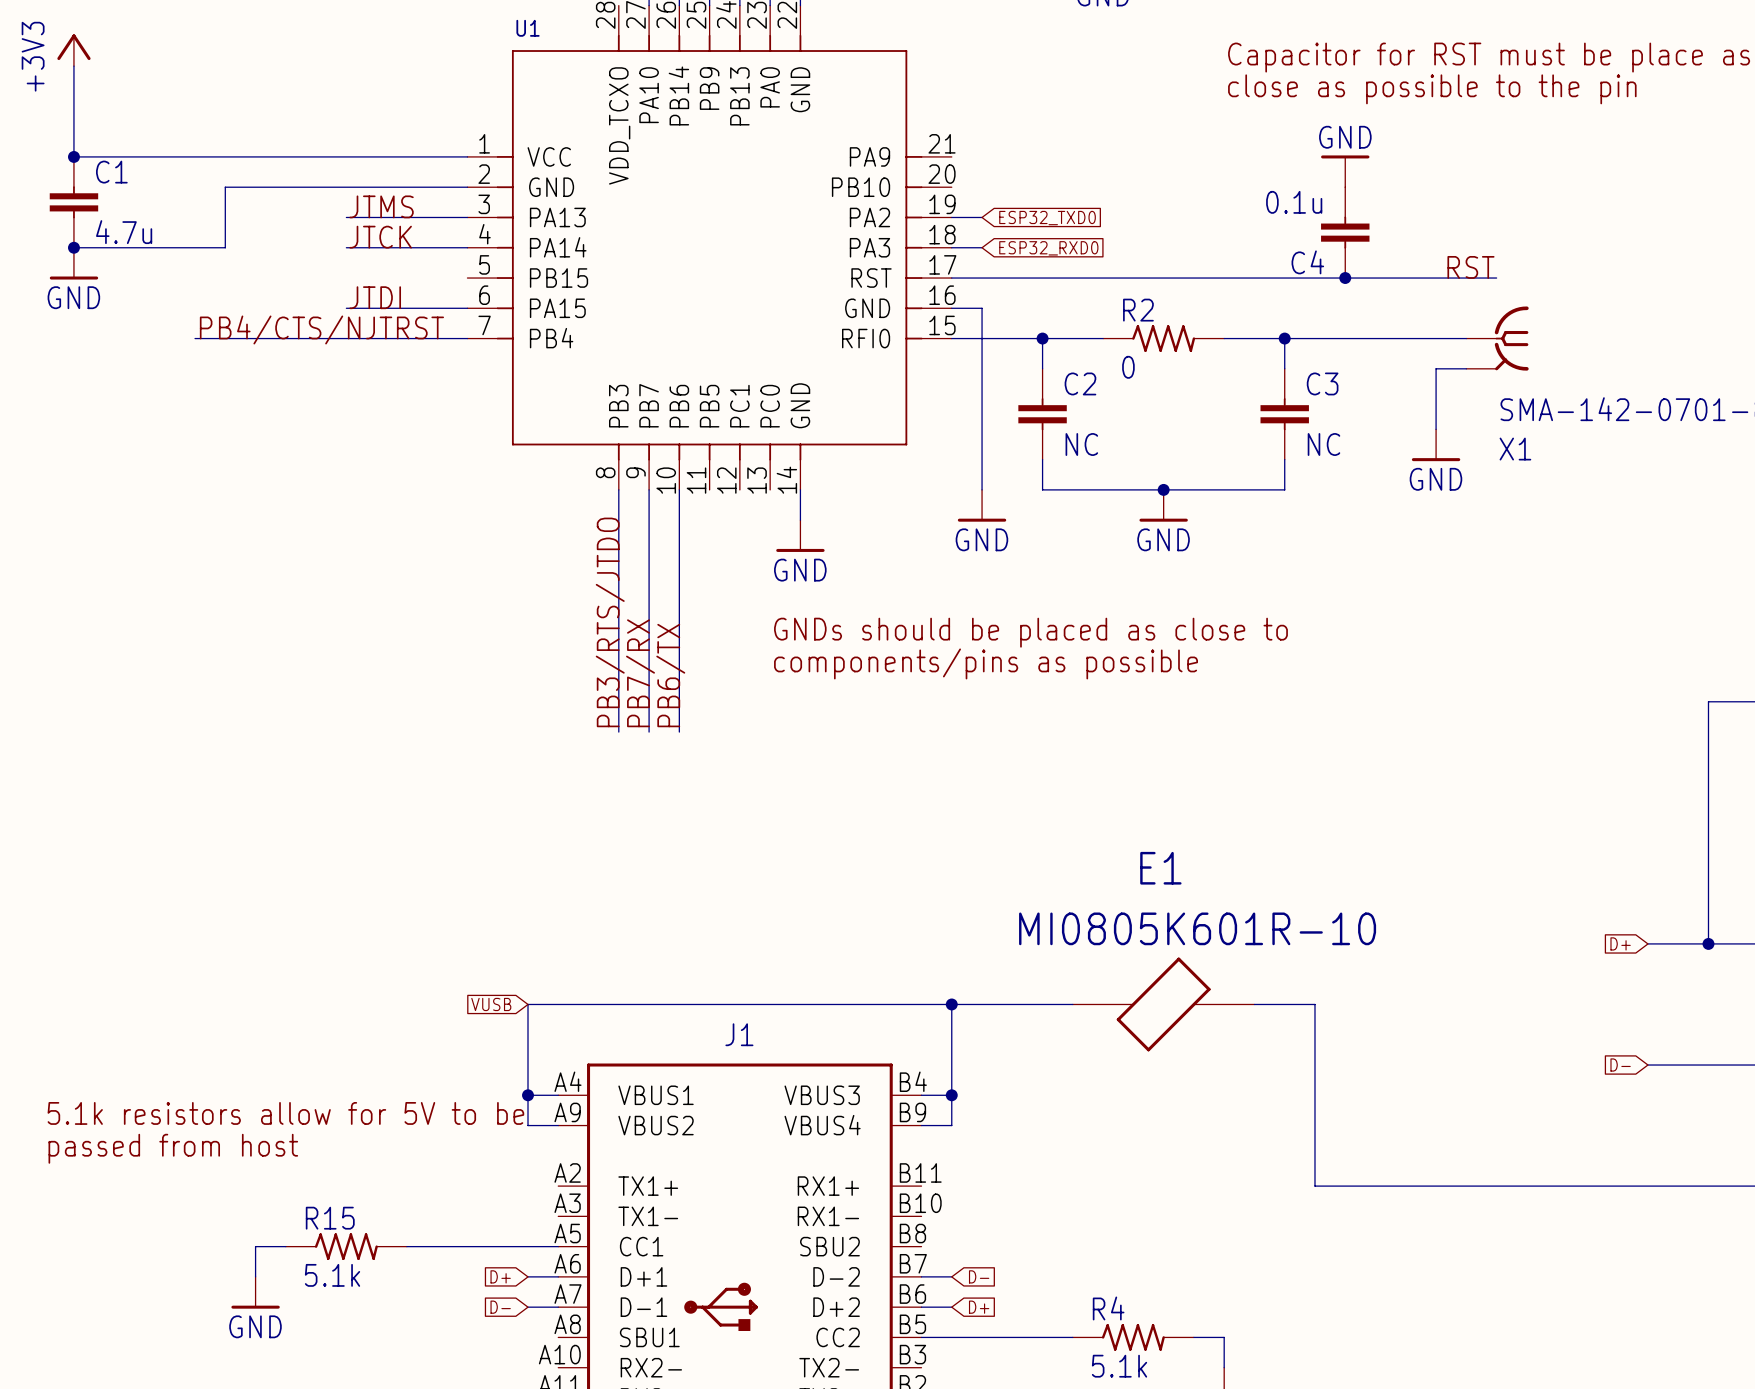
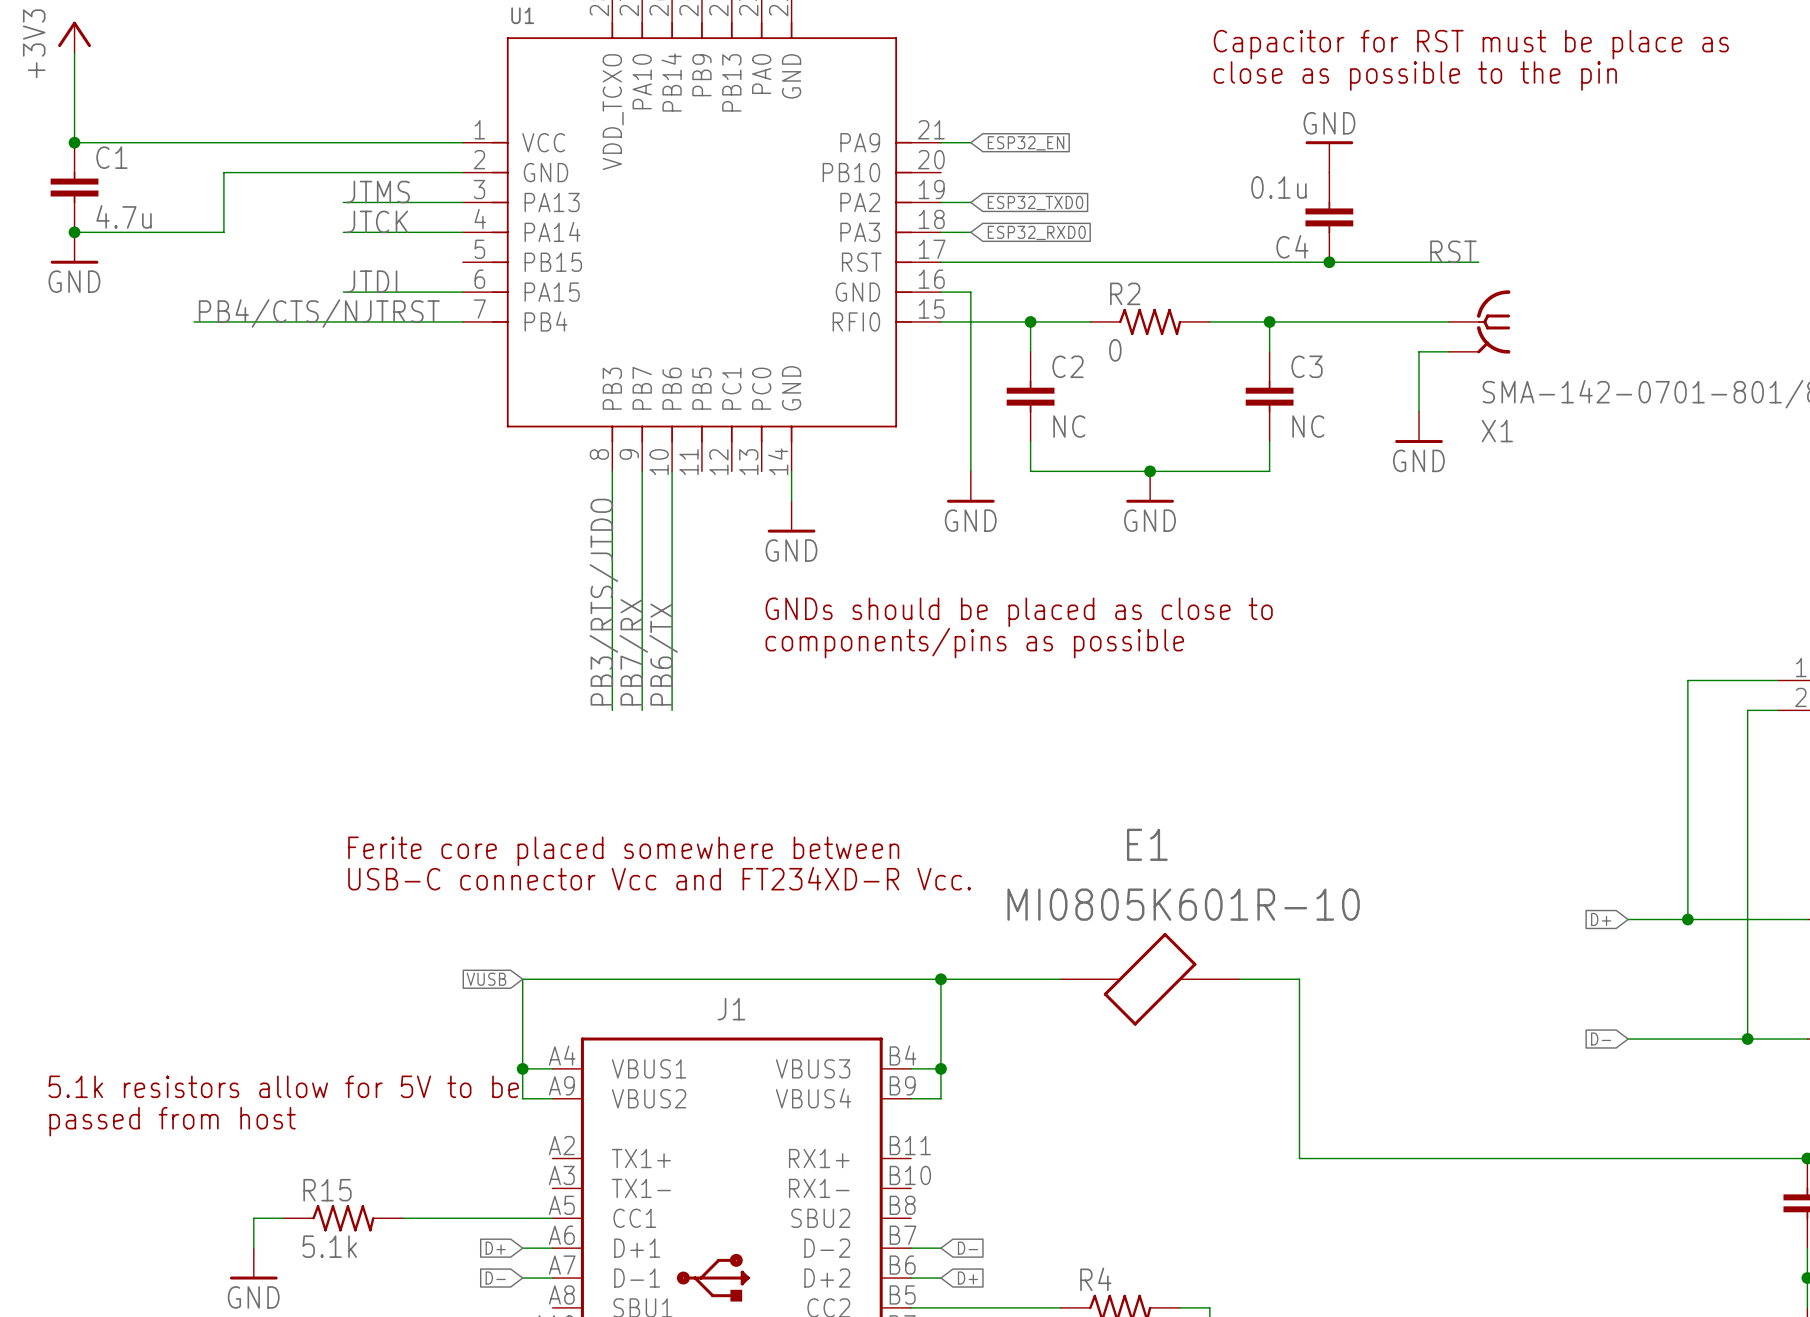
wire: none -> (940, 142) (970, 142)
global label: none -> ESP32_EN (1026, 143)
text: none -> Ferite core placed somewhere between (623, 851)
text: none -> USB-C connector Vcc and FT234XD-R Vcc. (659, 878)

